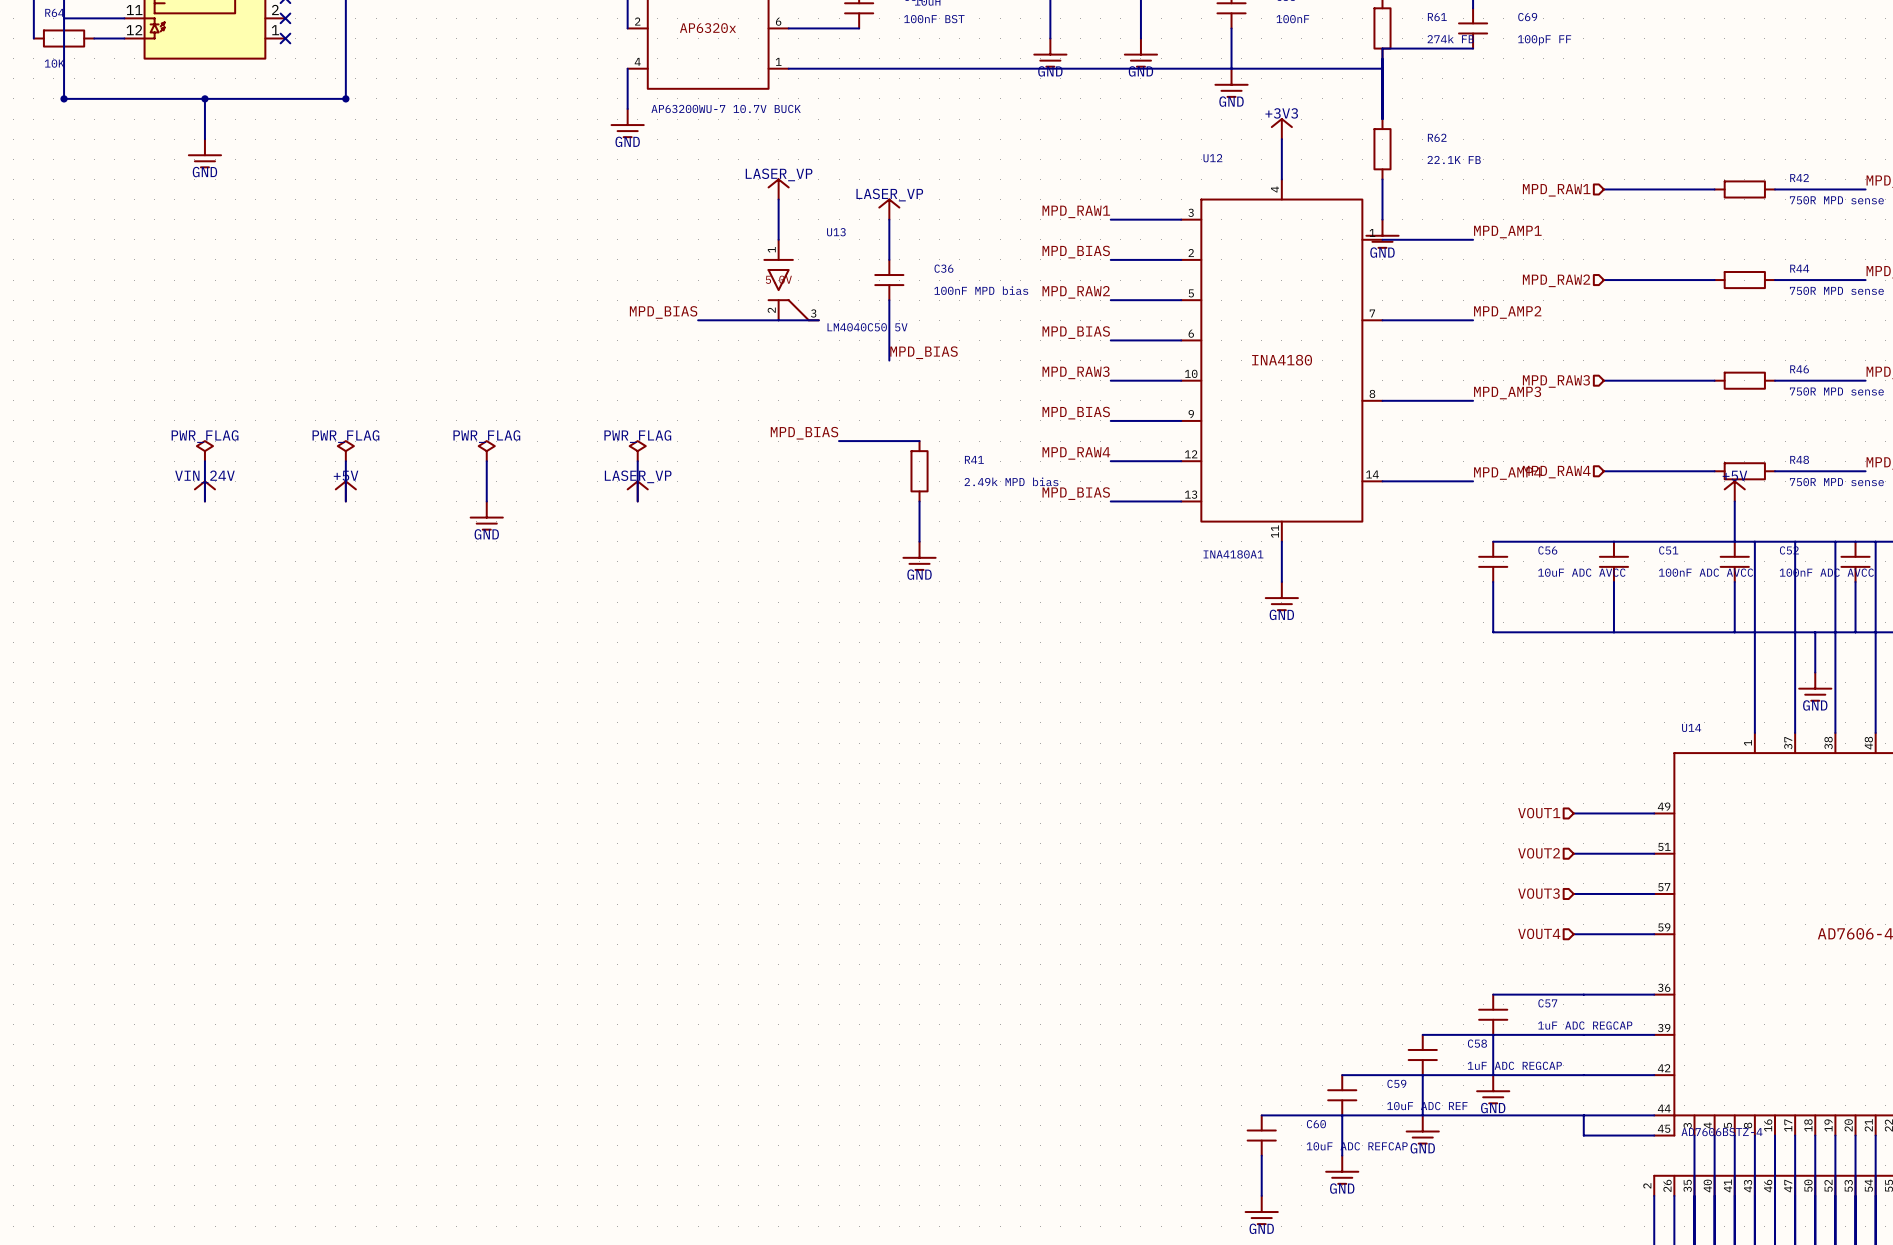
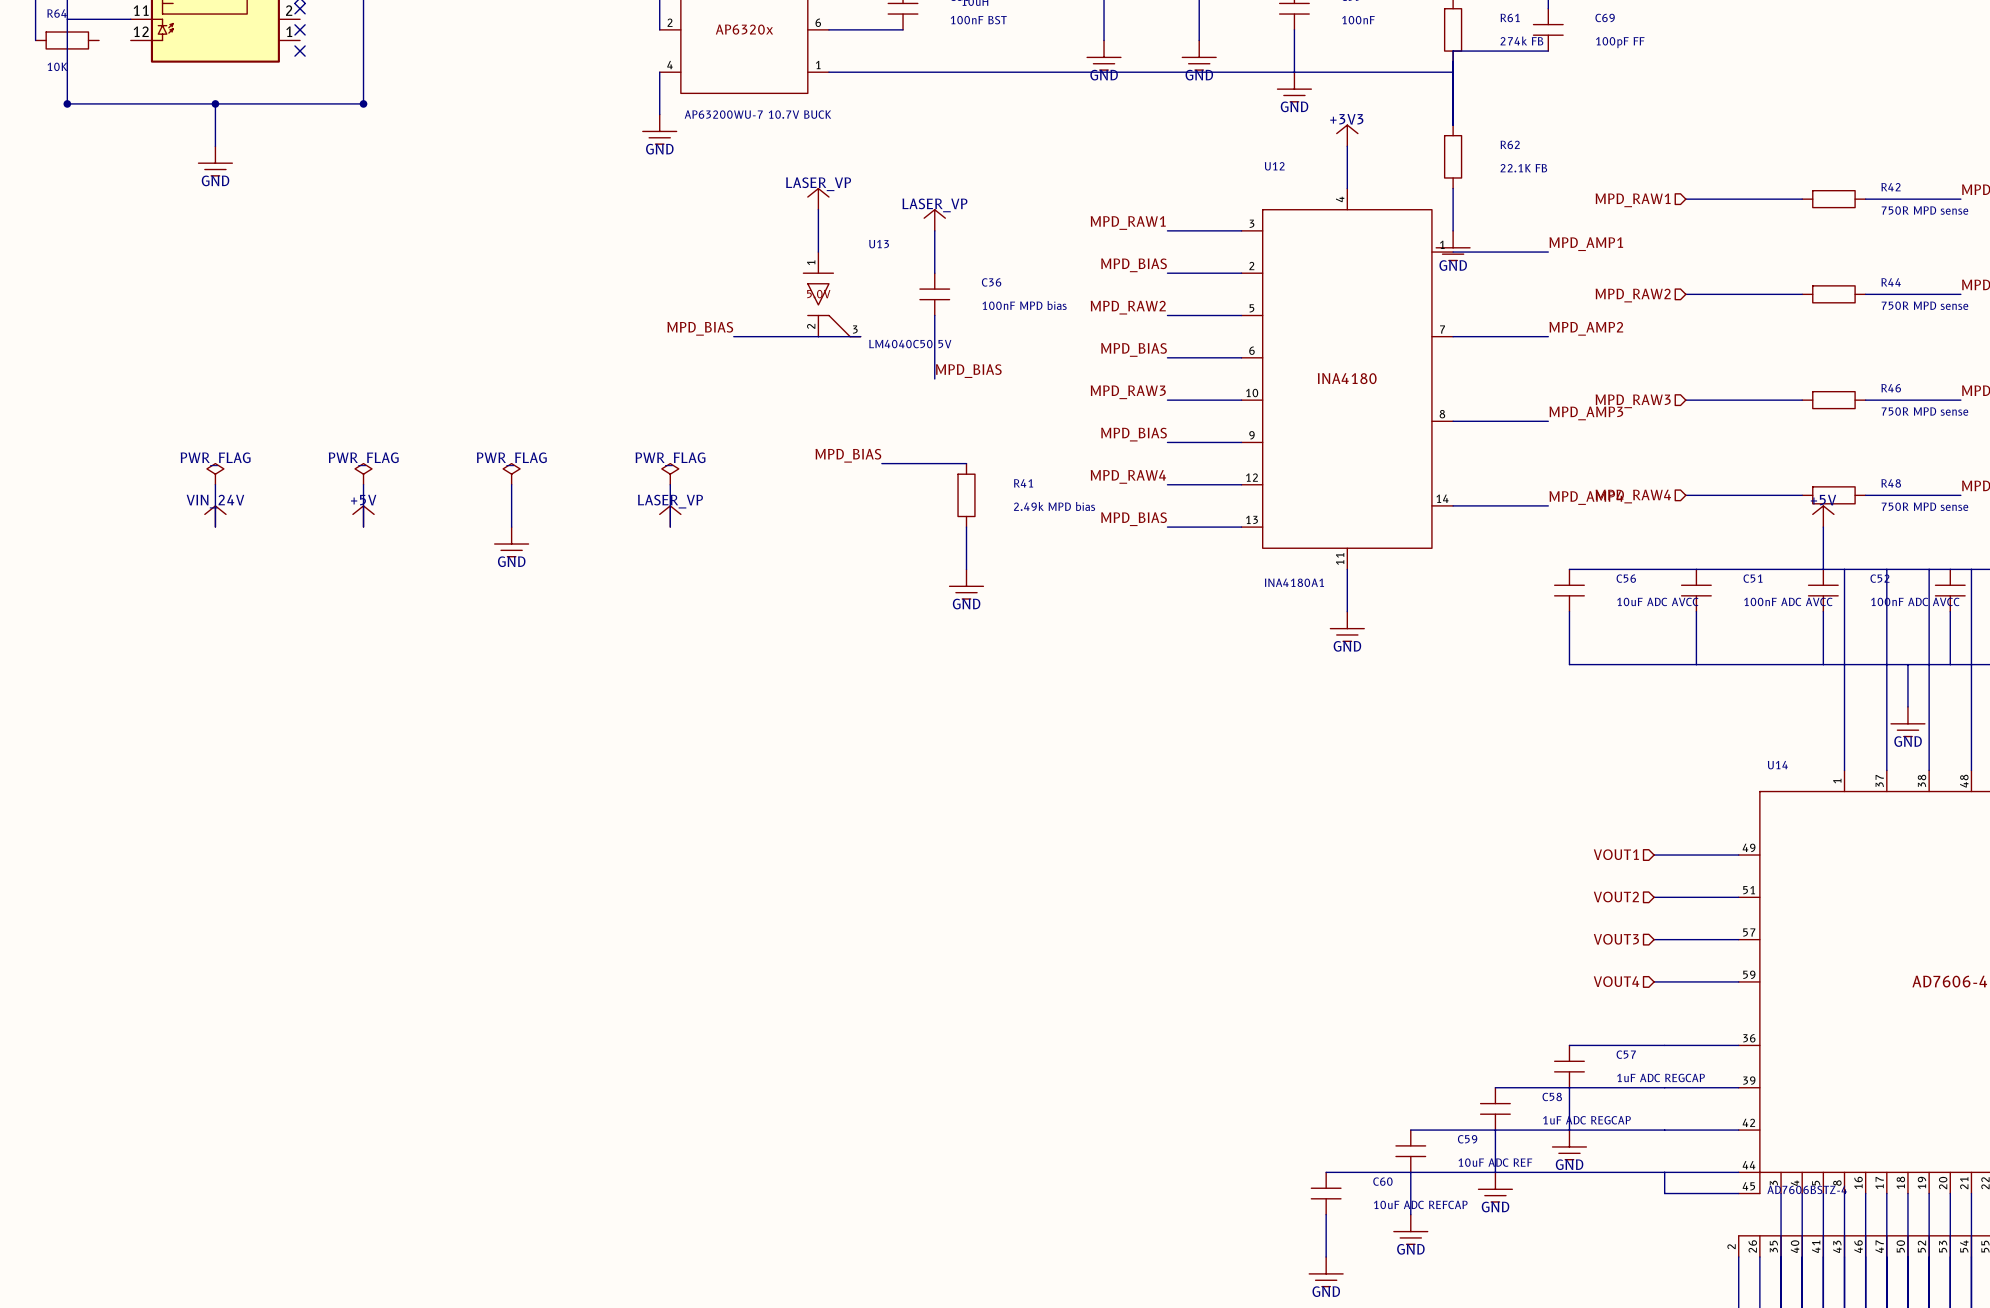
no-connect mark: none -> (300, 8)
no-connect mark: (285, 18) -> none
no-connect mark: none -> (300, 29)
wire: (94, 38) (124, 38) -> none
no-connect mark: (285, 38) -> none
no-connect mark: none -> (300, 51)

